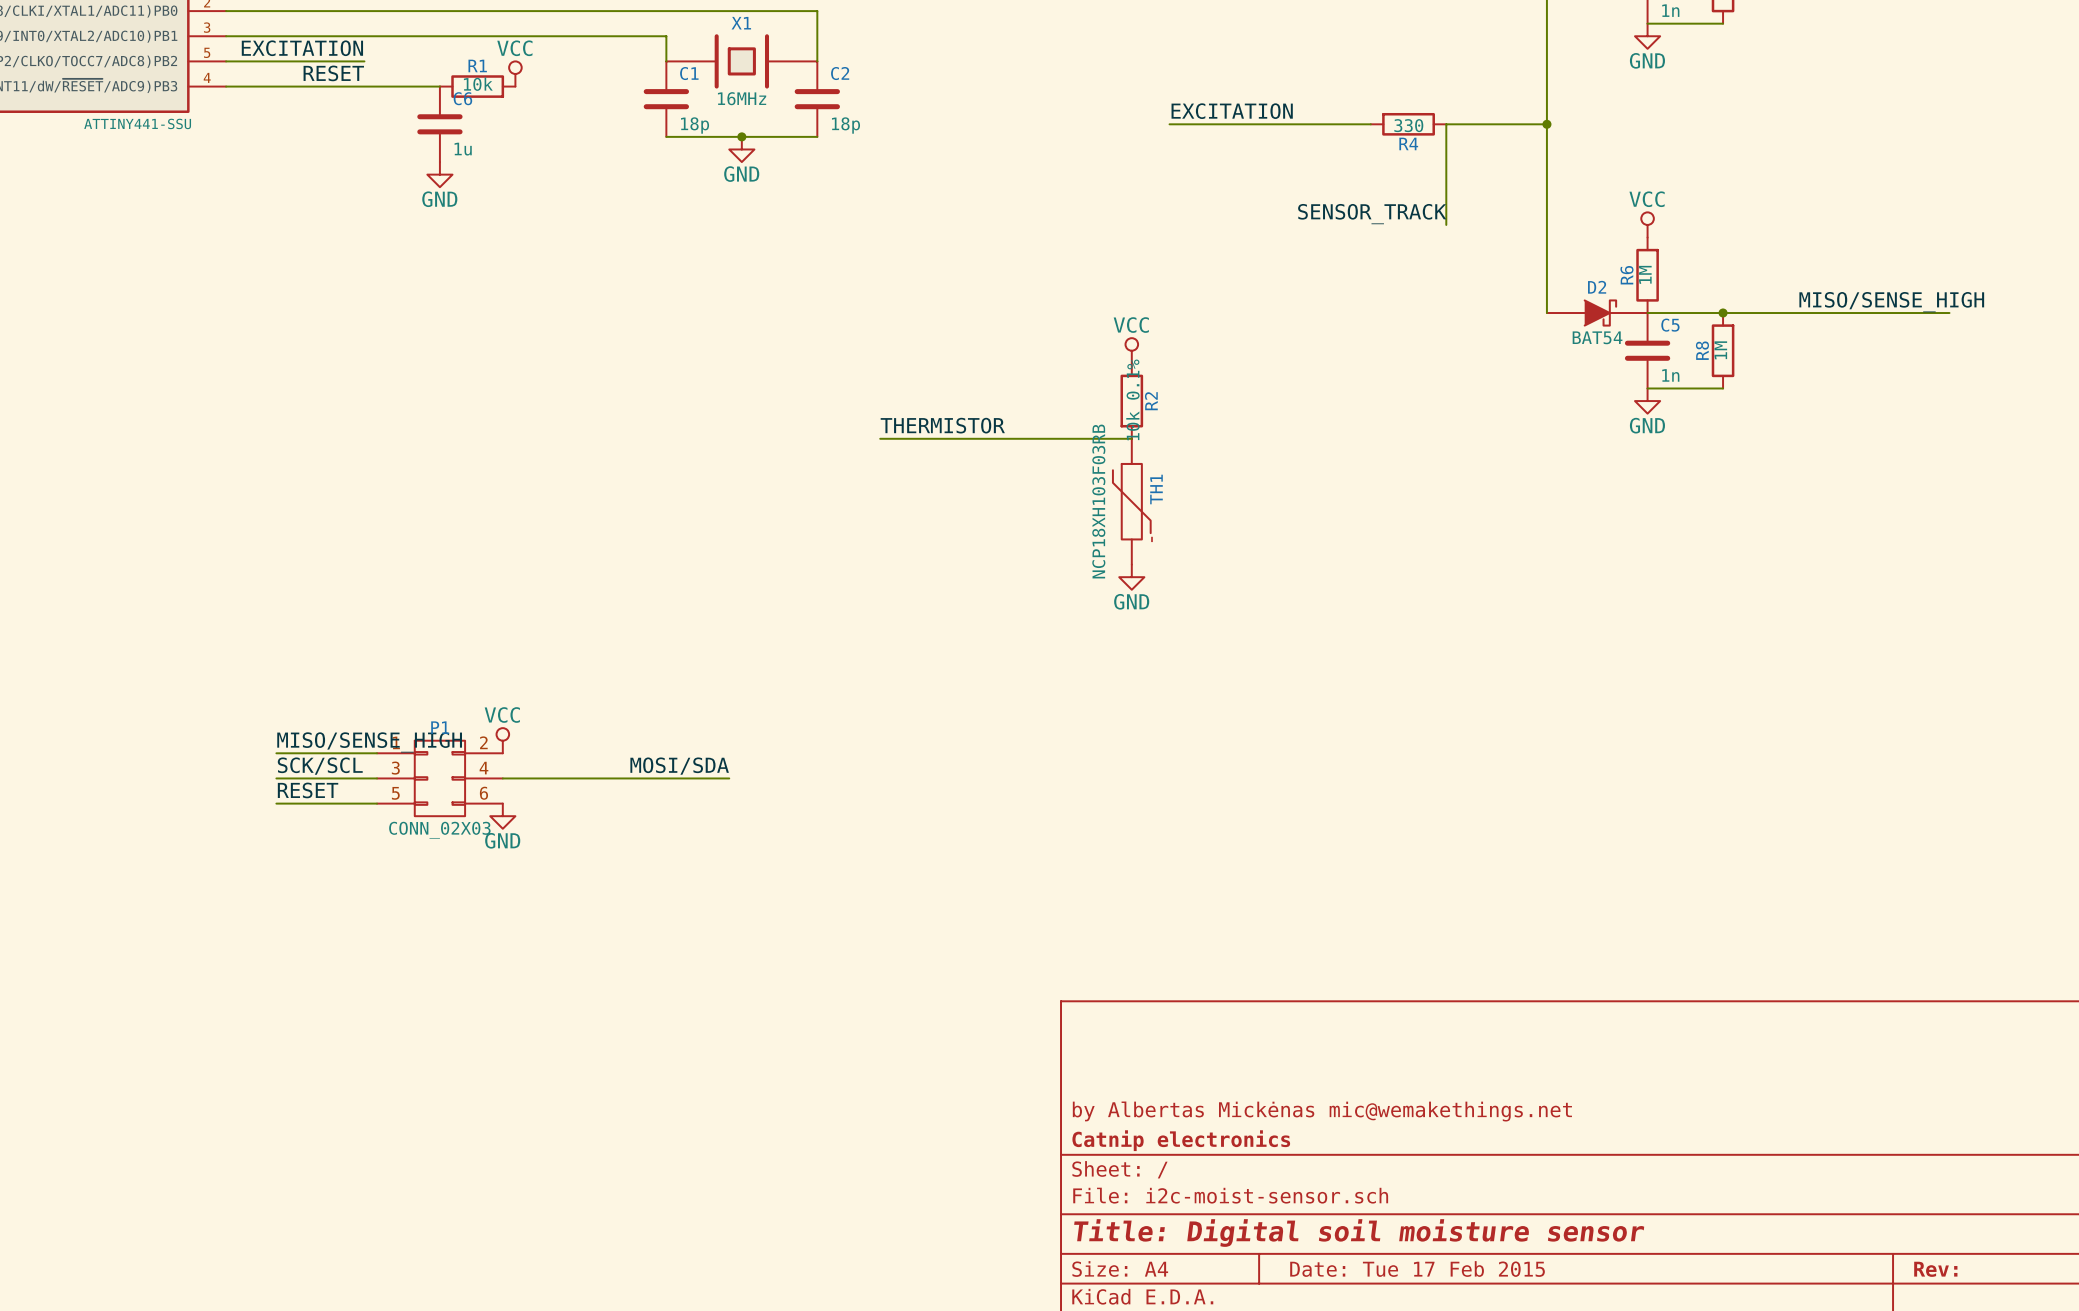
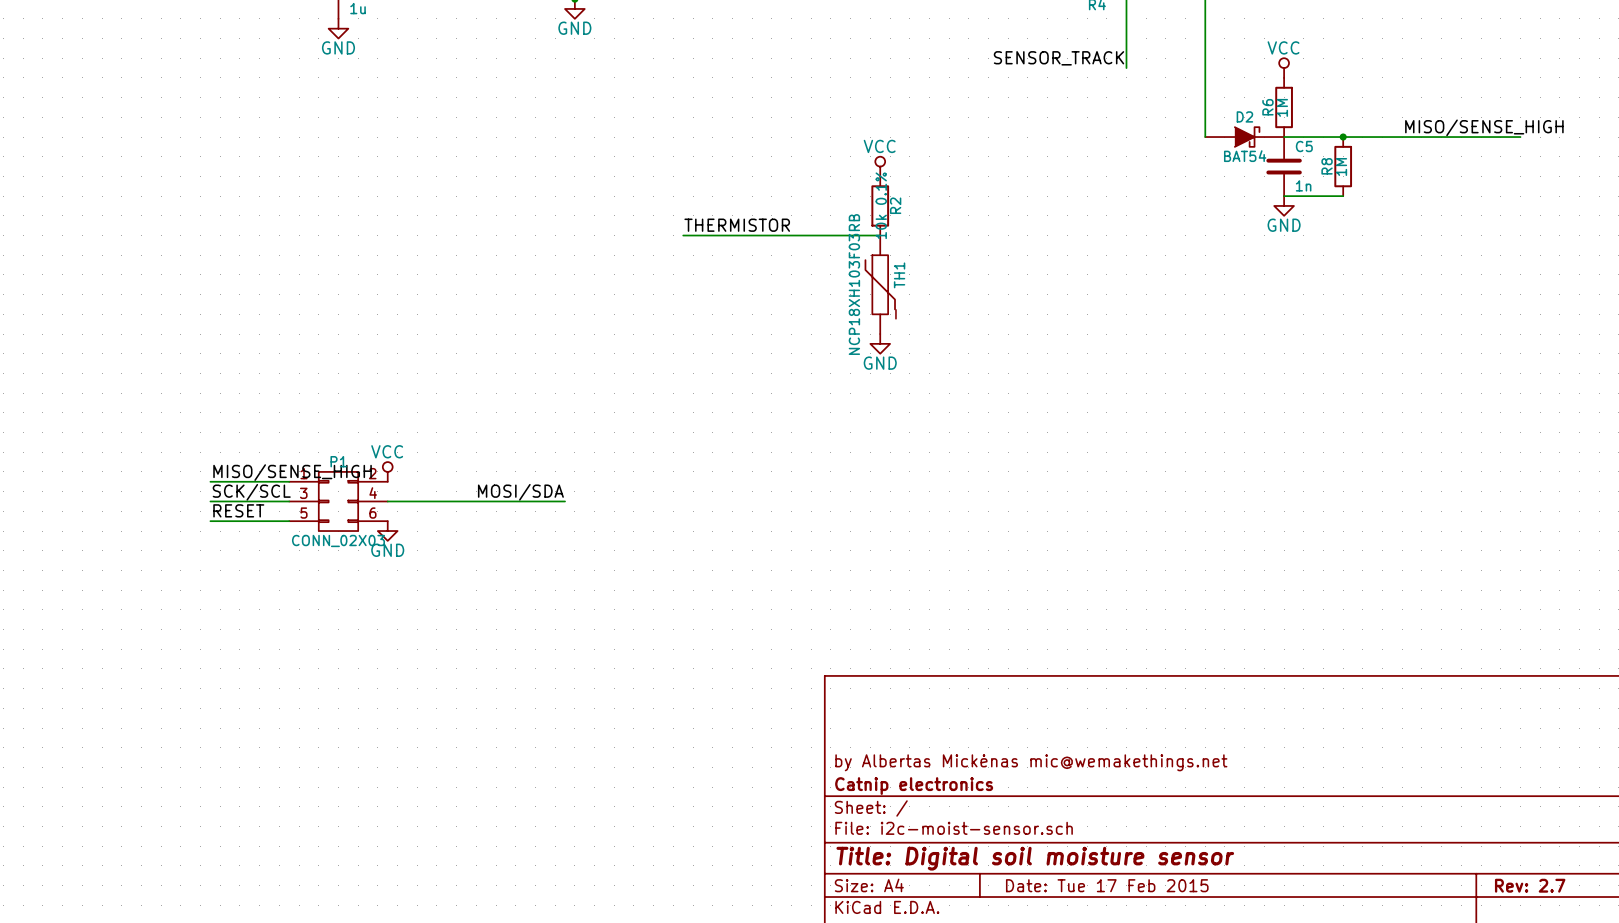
title block: Rev: (1935, 1269) -> Rev: 2.7 (1530, 885)

